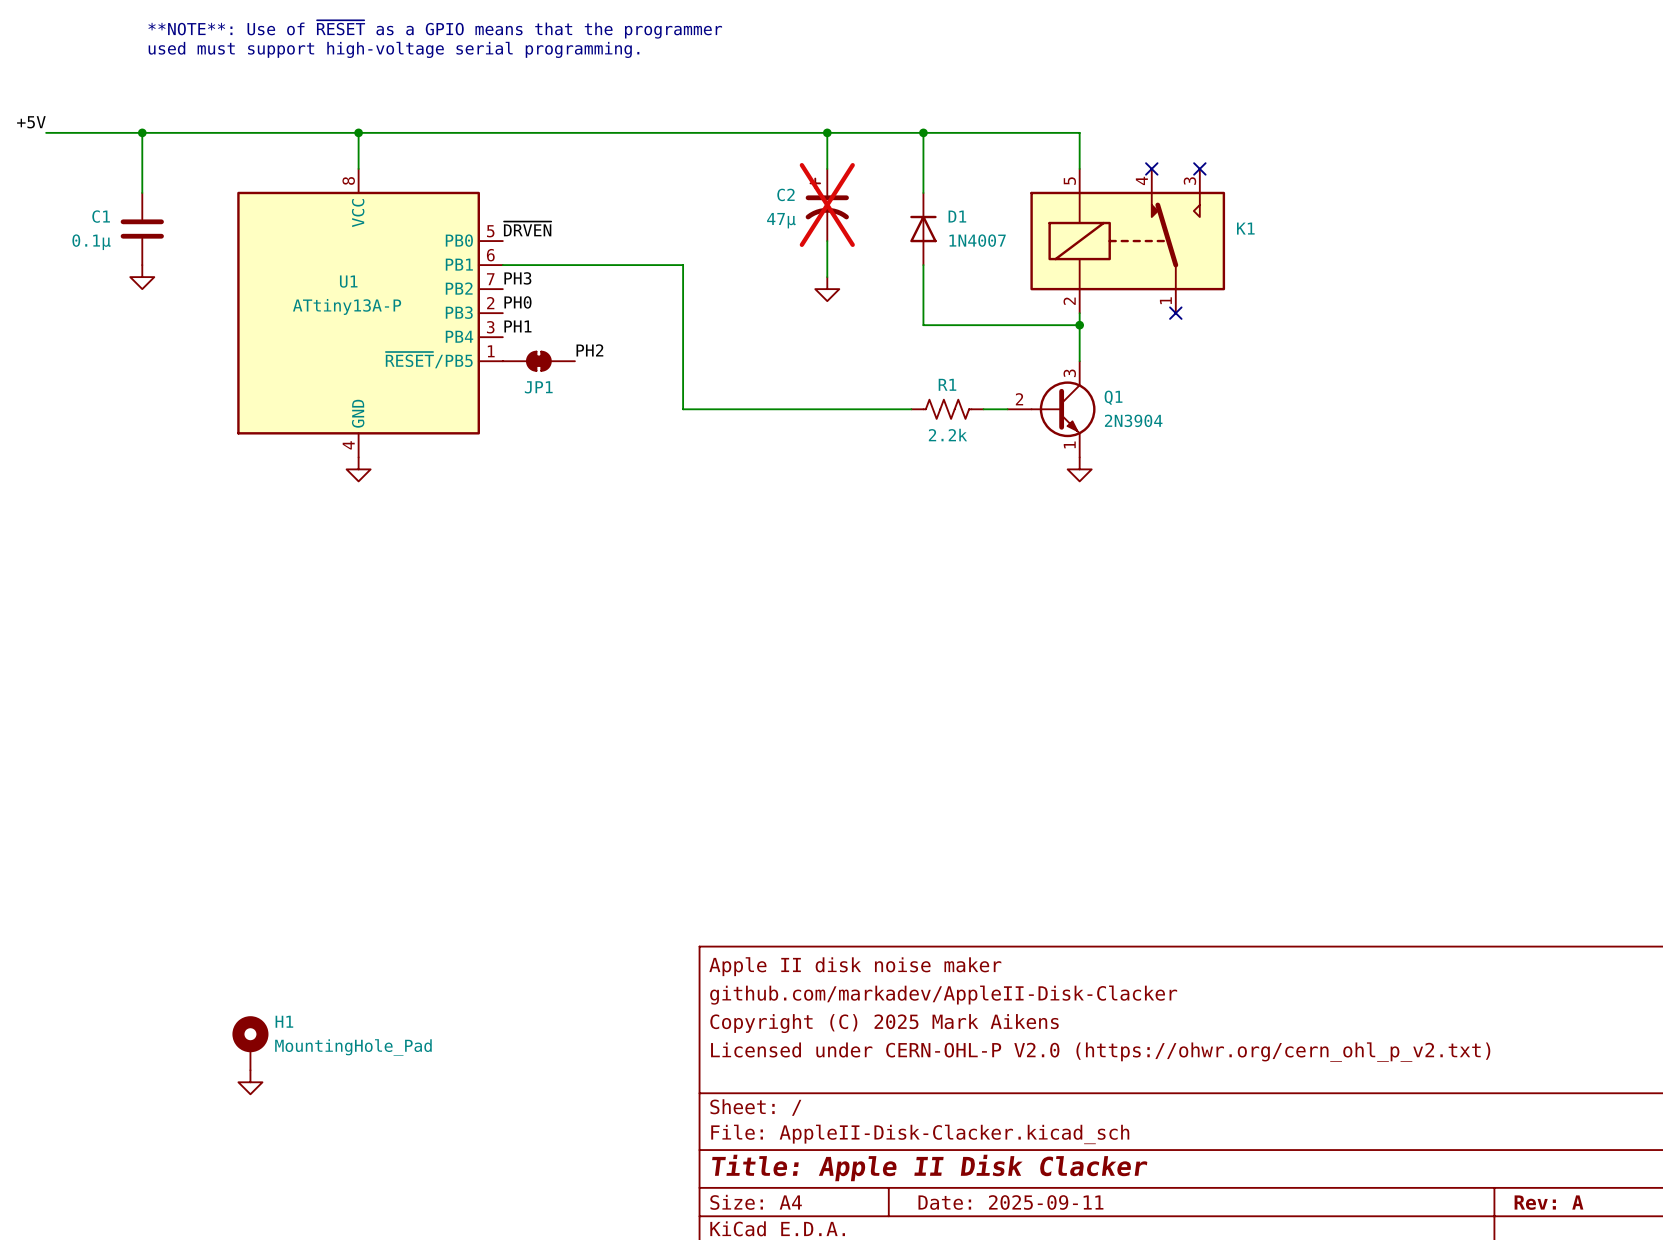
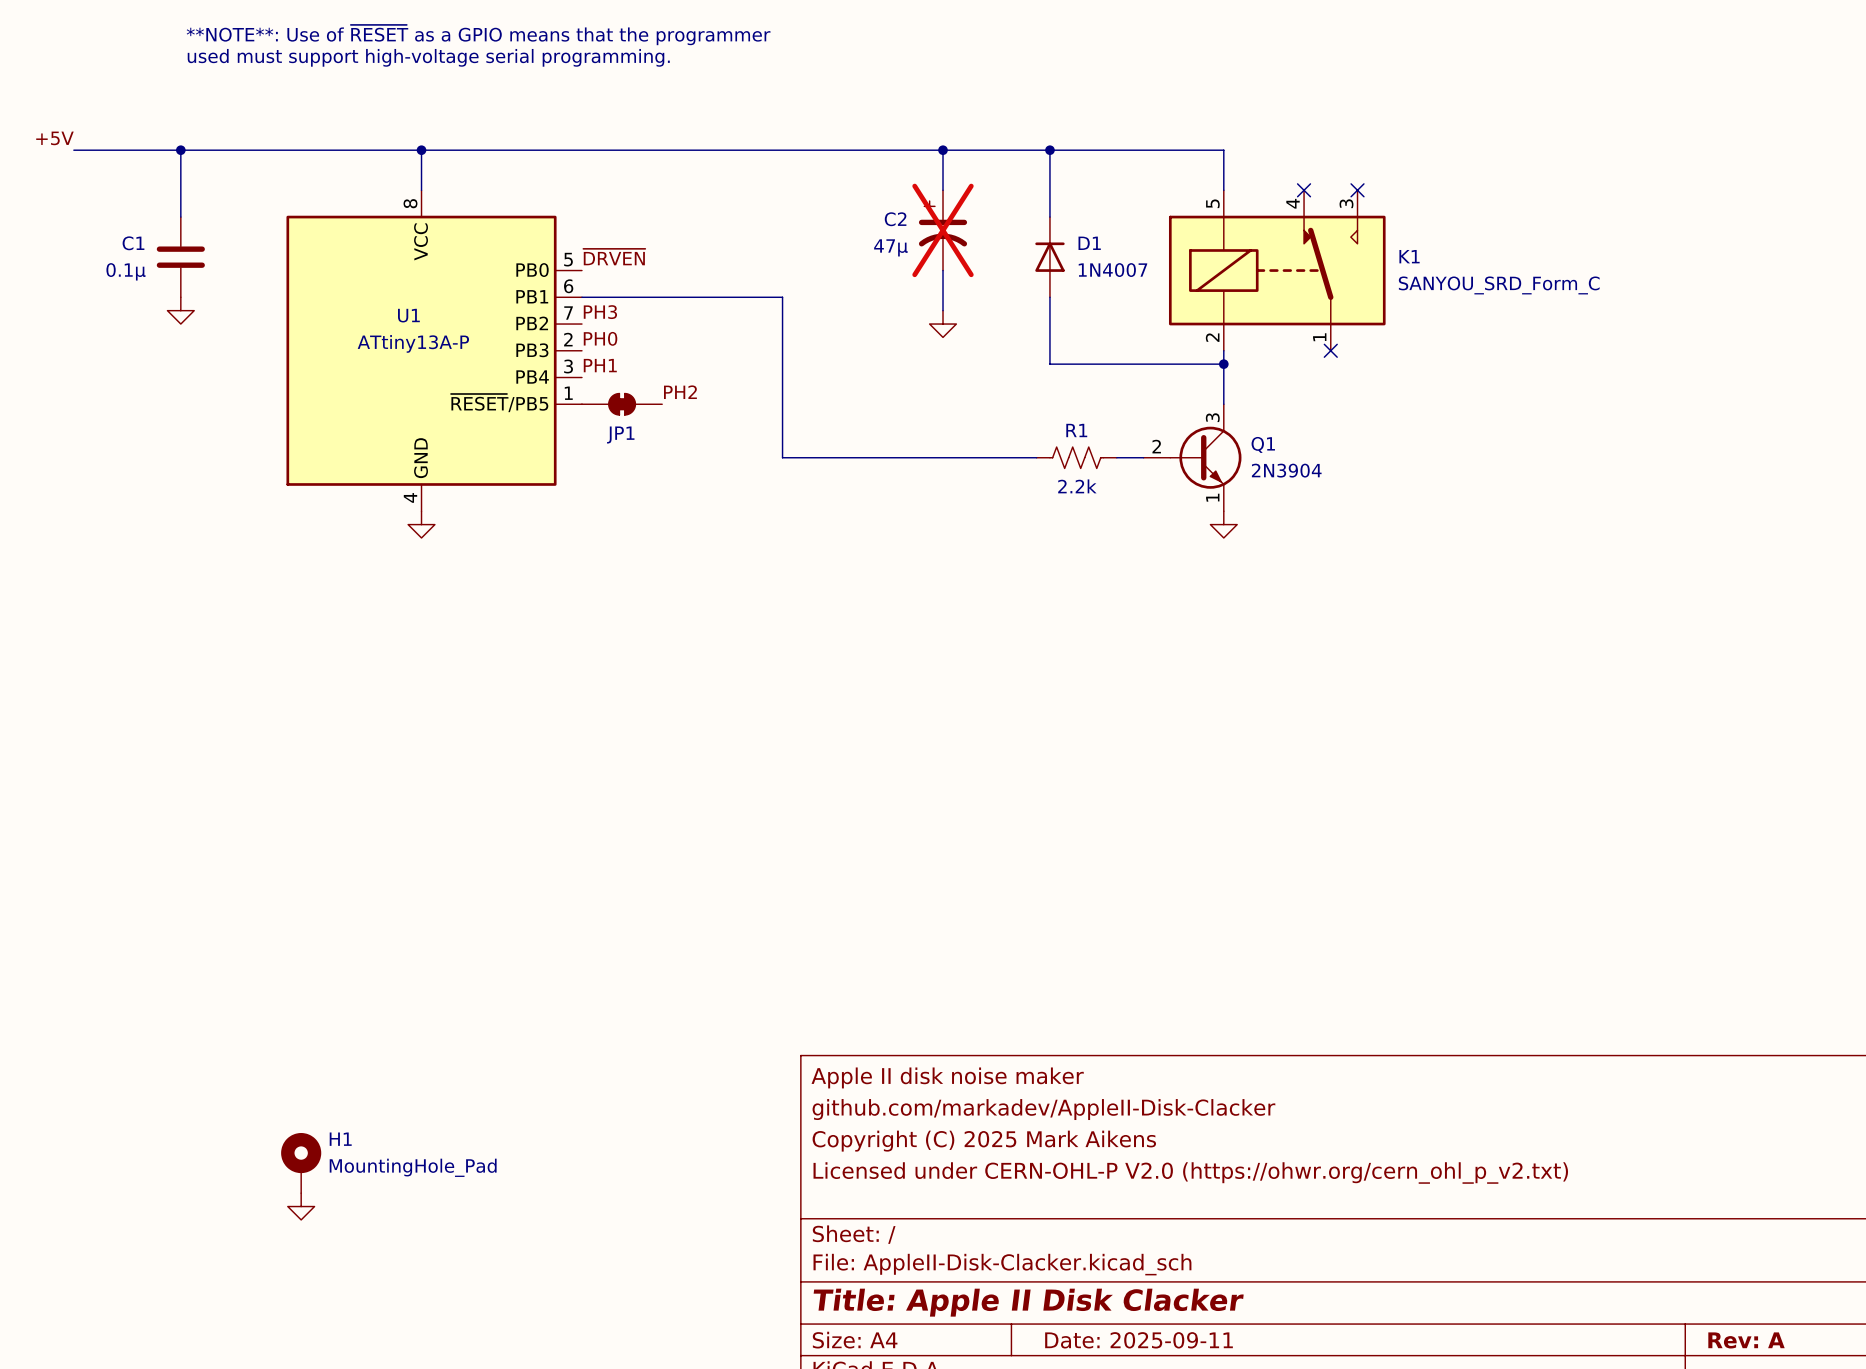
K1 value: none -> SANYOU_SRD_Form_C (1499, 285)

